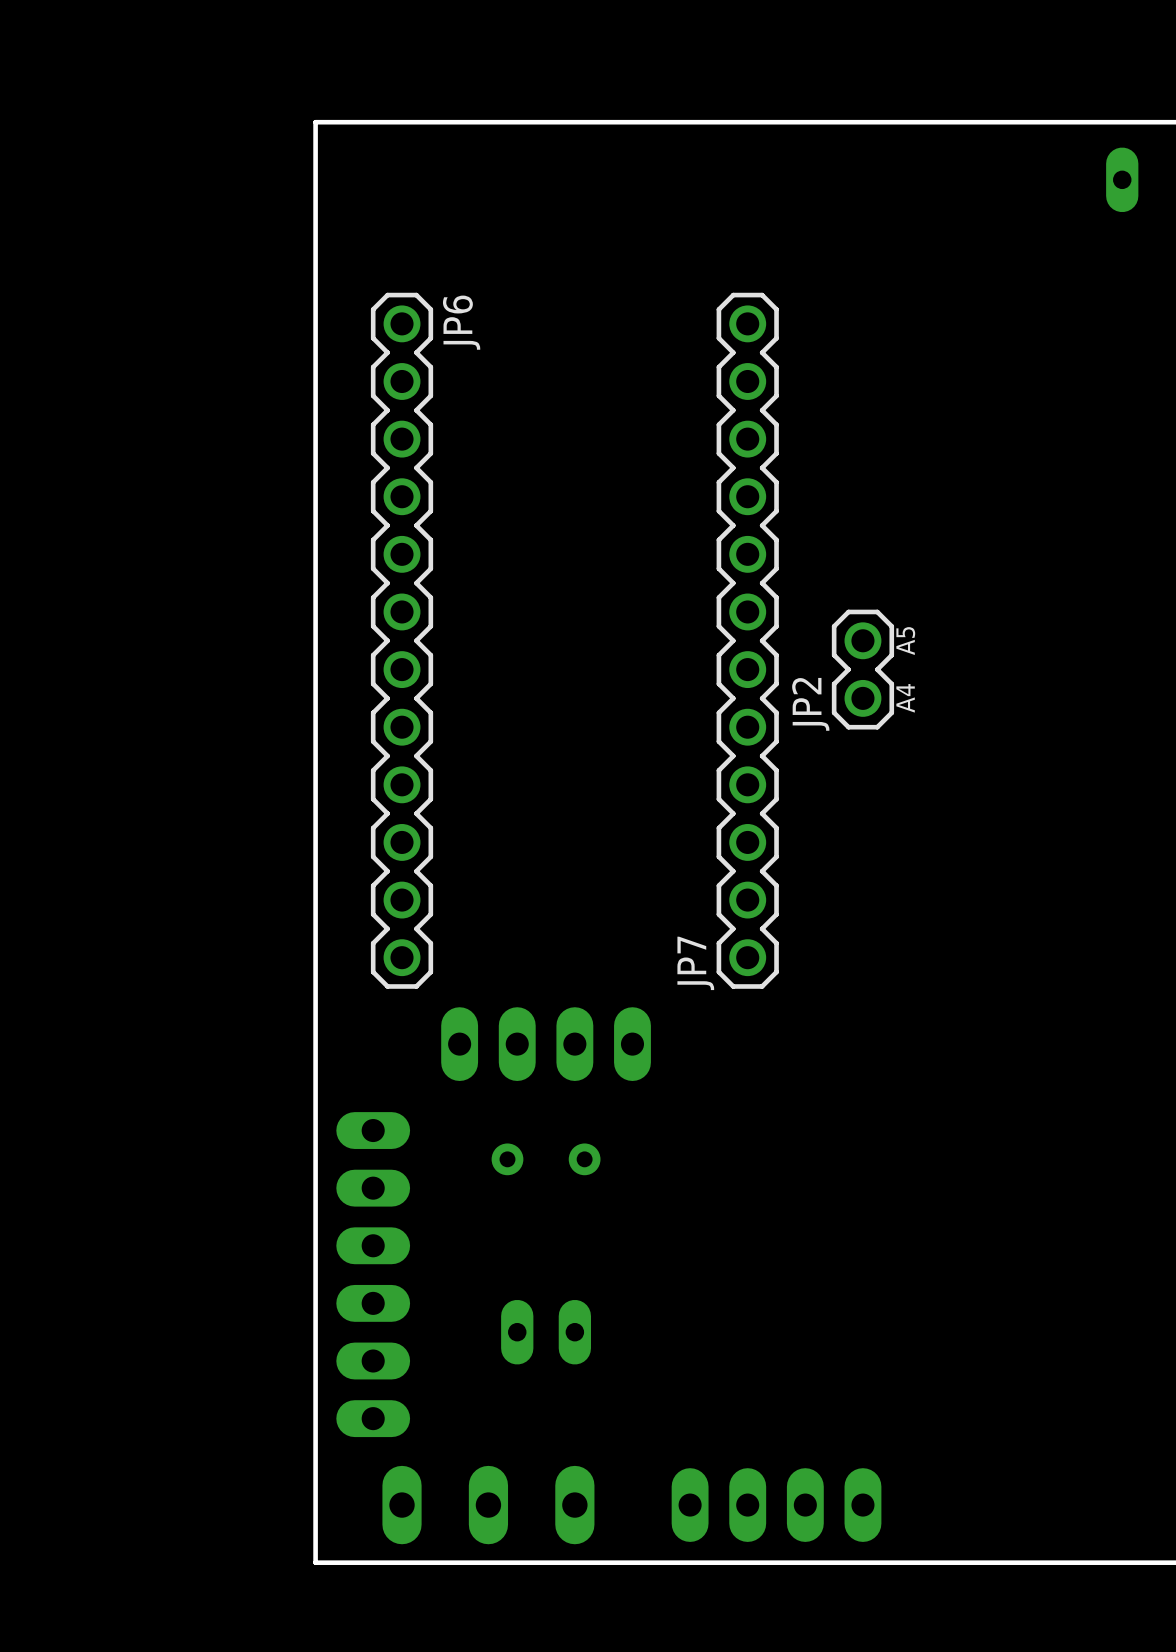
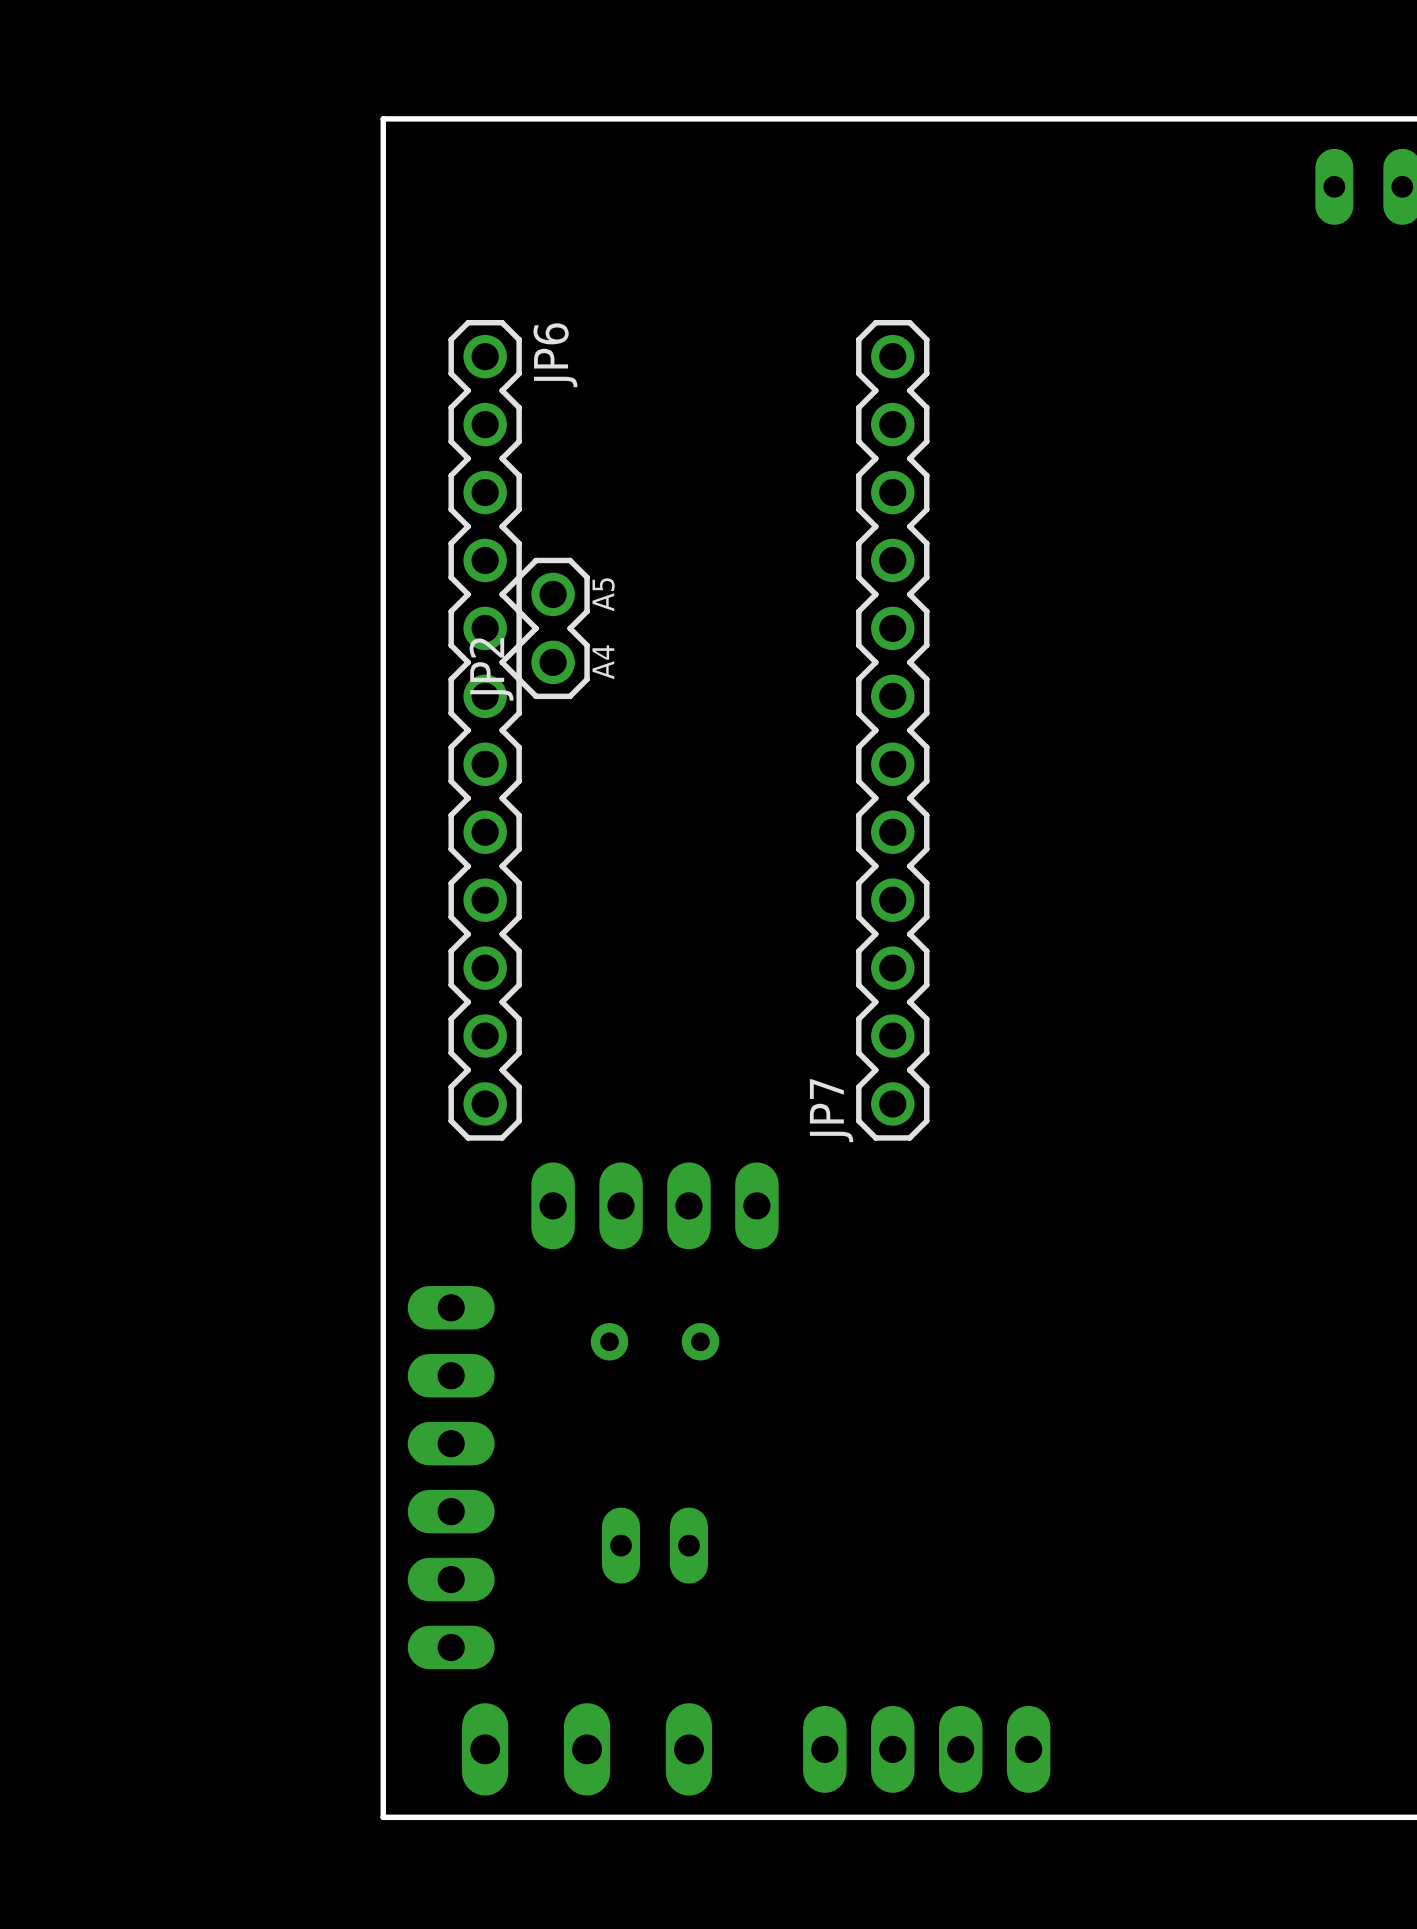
text position: A5 (905, 641) -> A5 (603, 594)
JP2 position: (862, 669) -> (553, 628)
text position: A4 (905, 698) -> A4 (603, 662)

